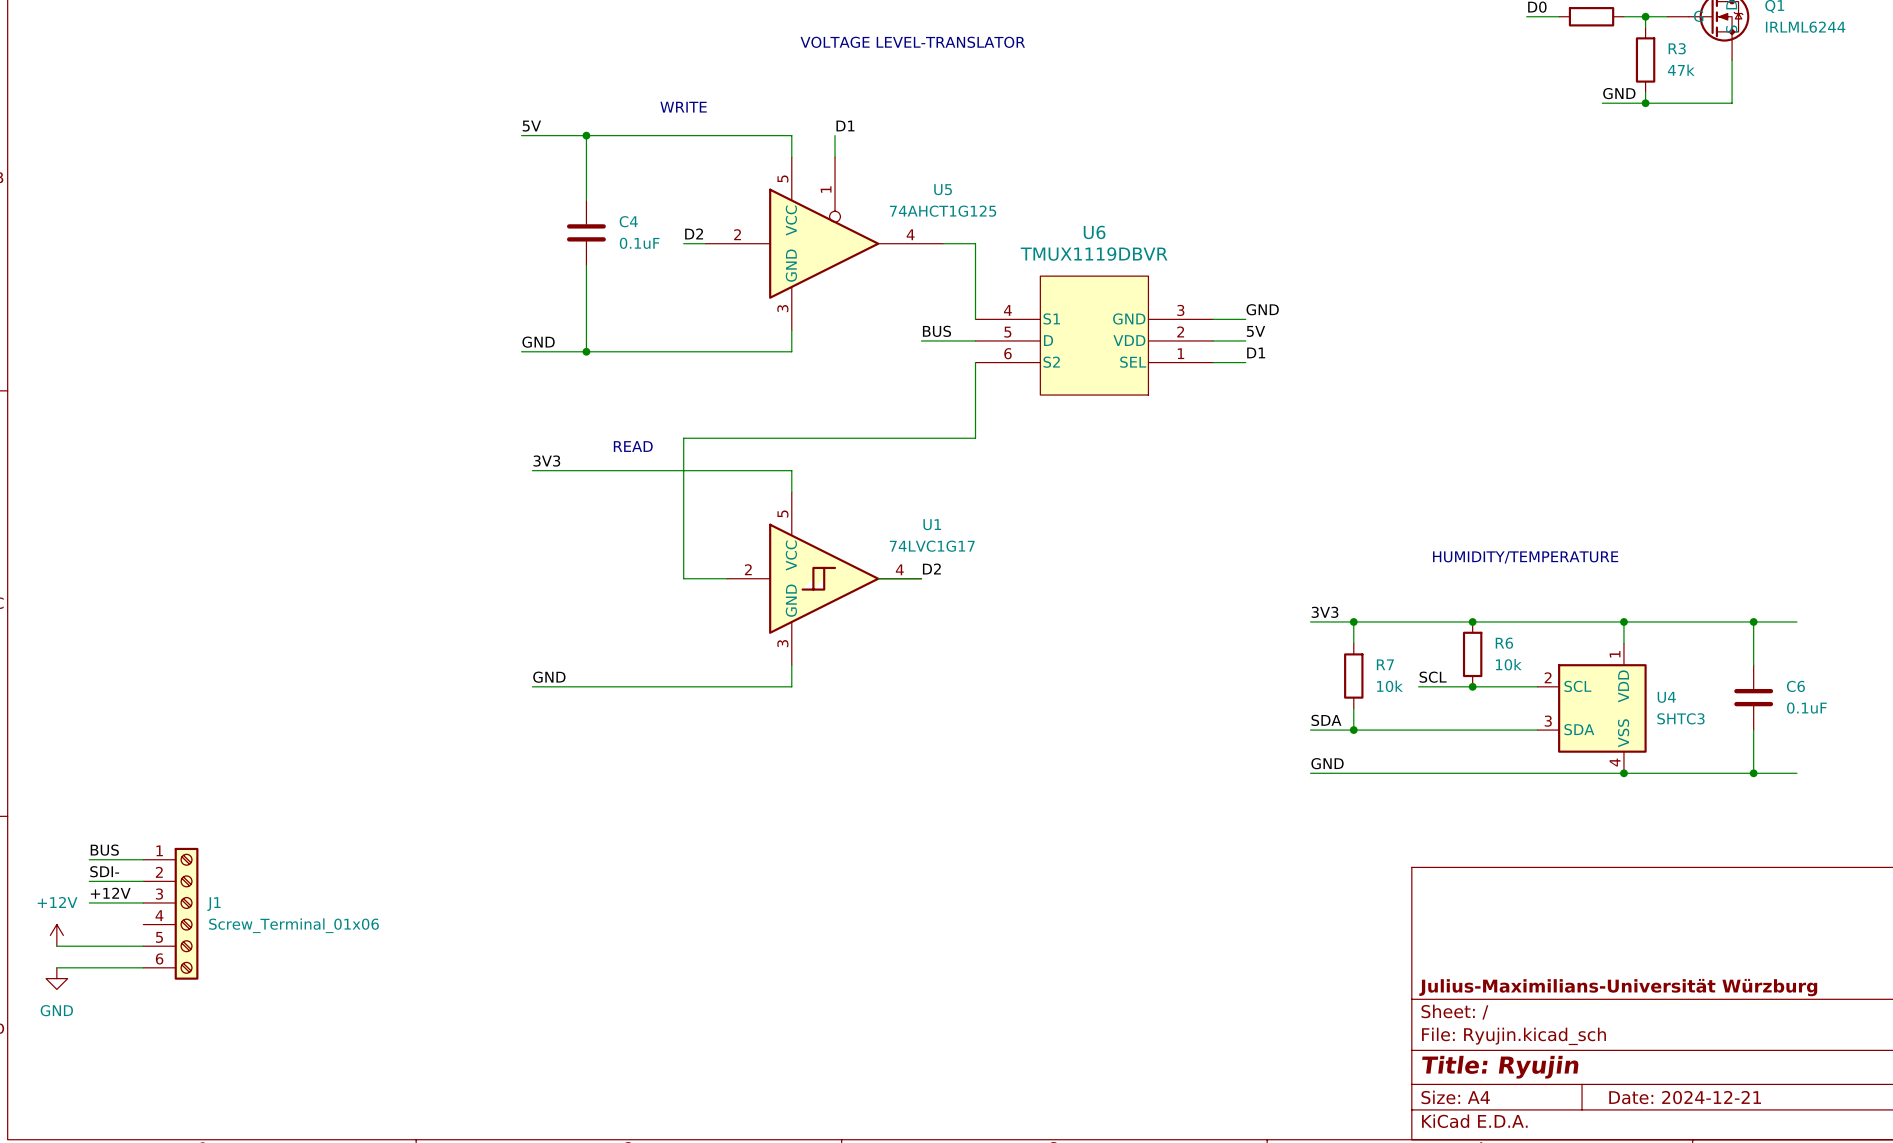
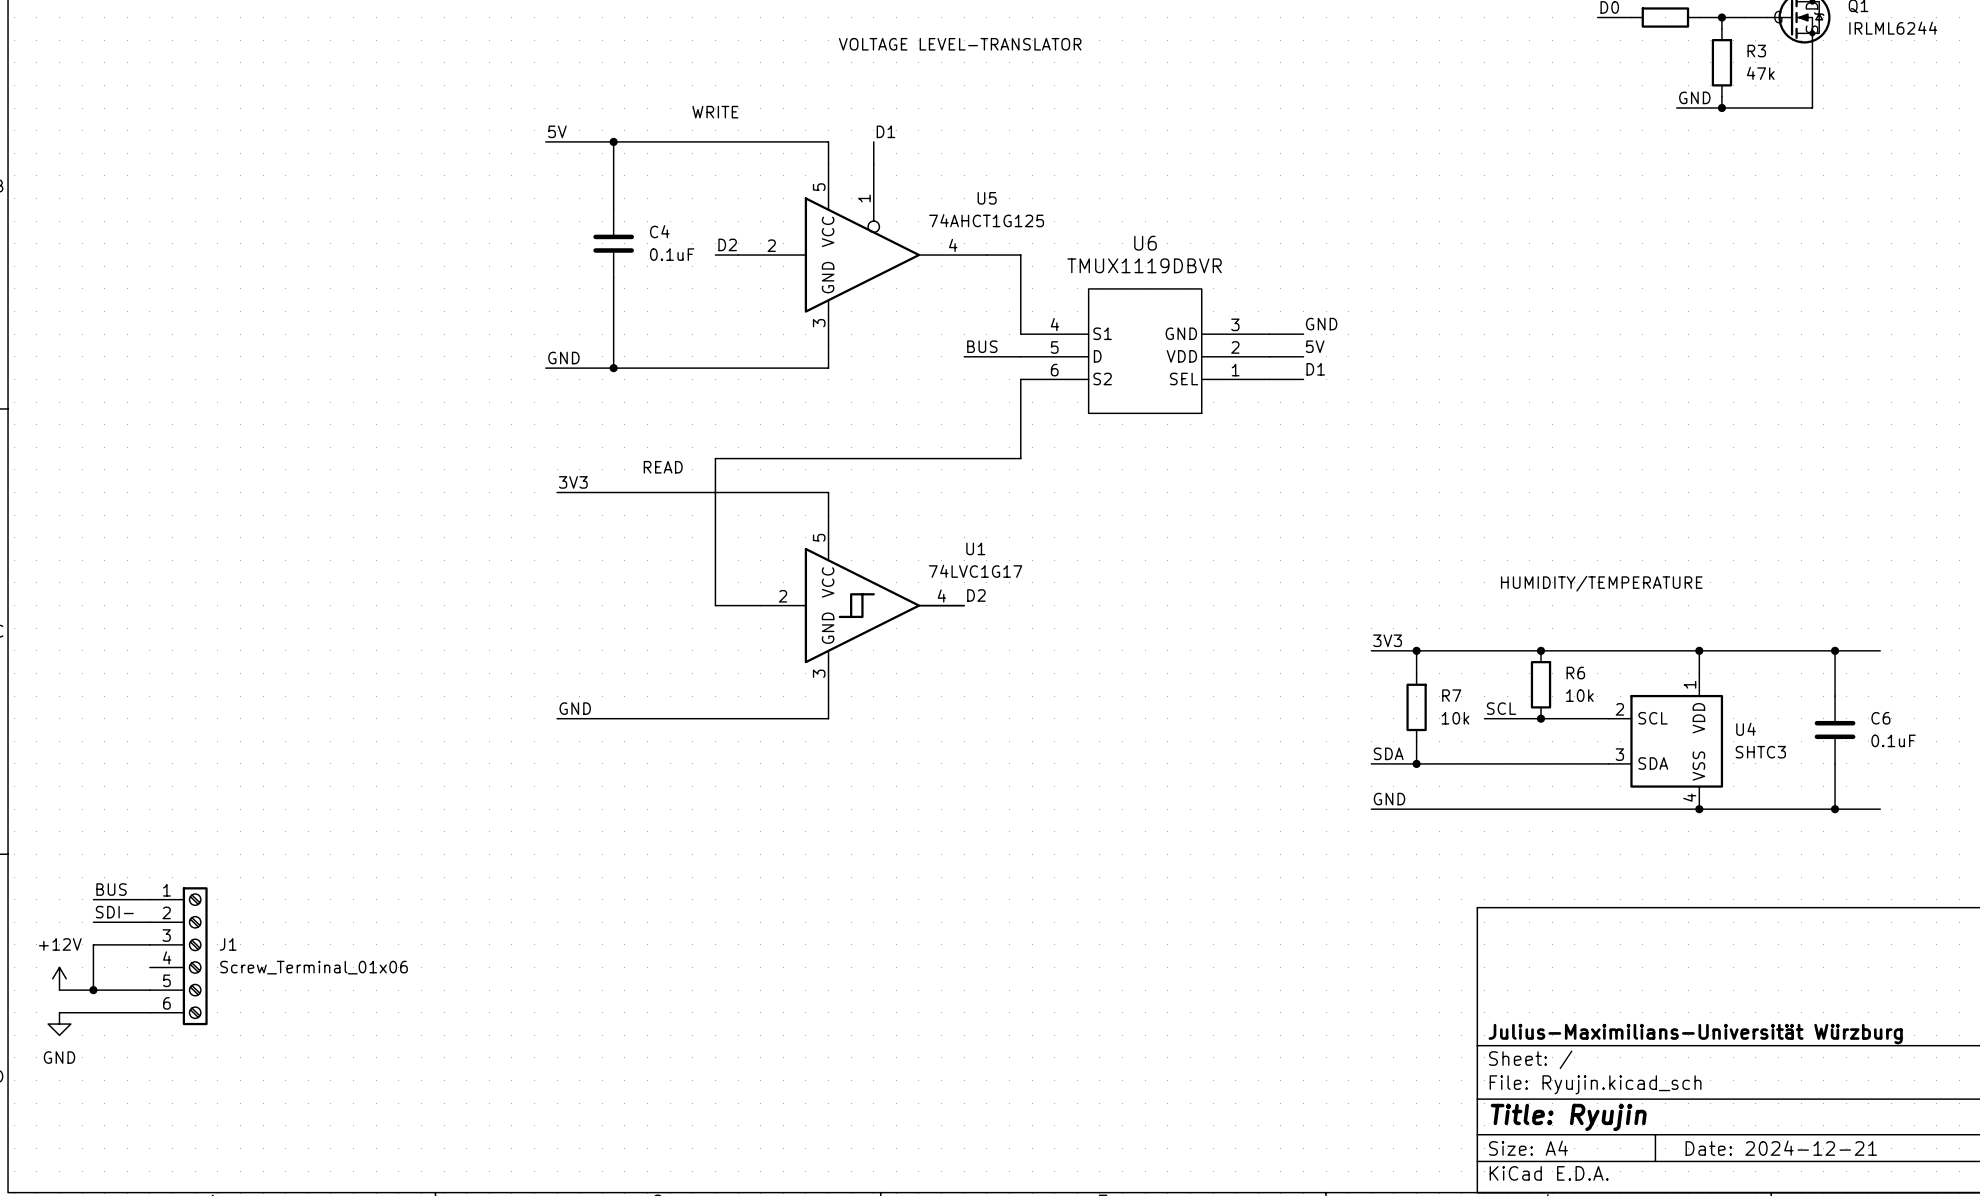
label: +12V (110, 893) -> none
wire: none -> (93, 944) (93, 990)
junction: none -> (93, 990)

